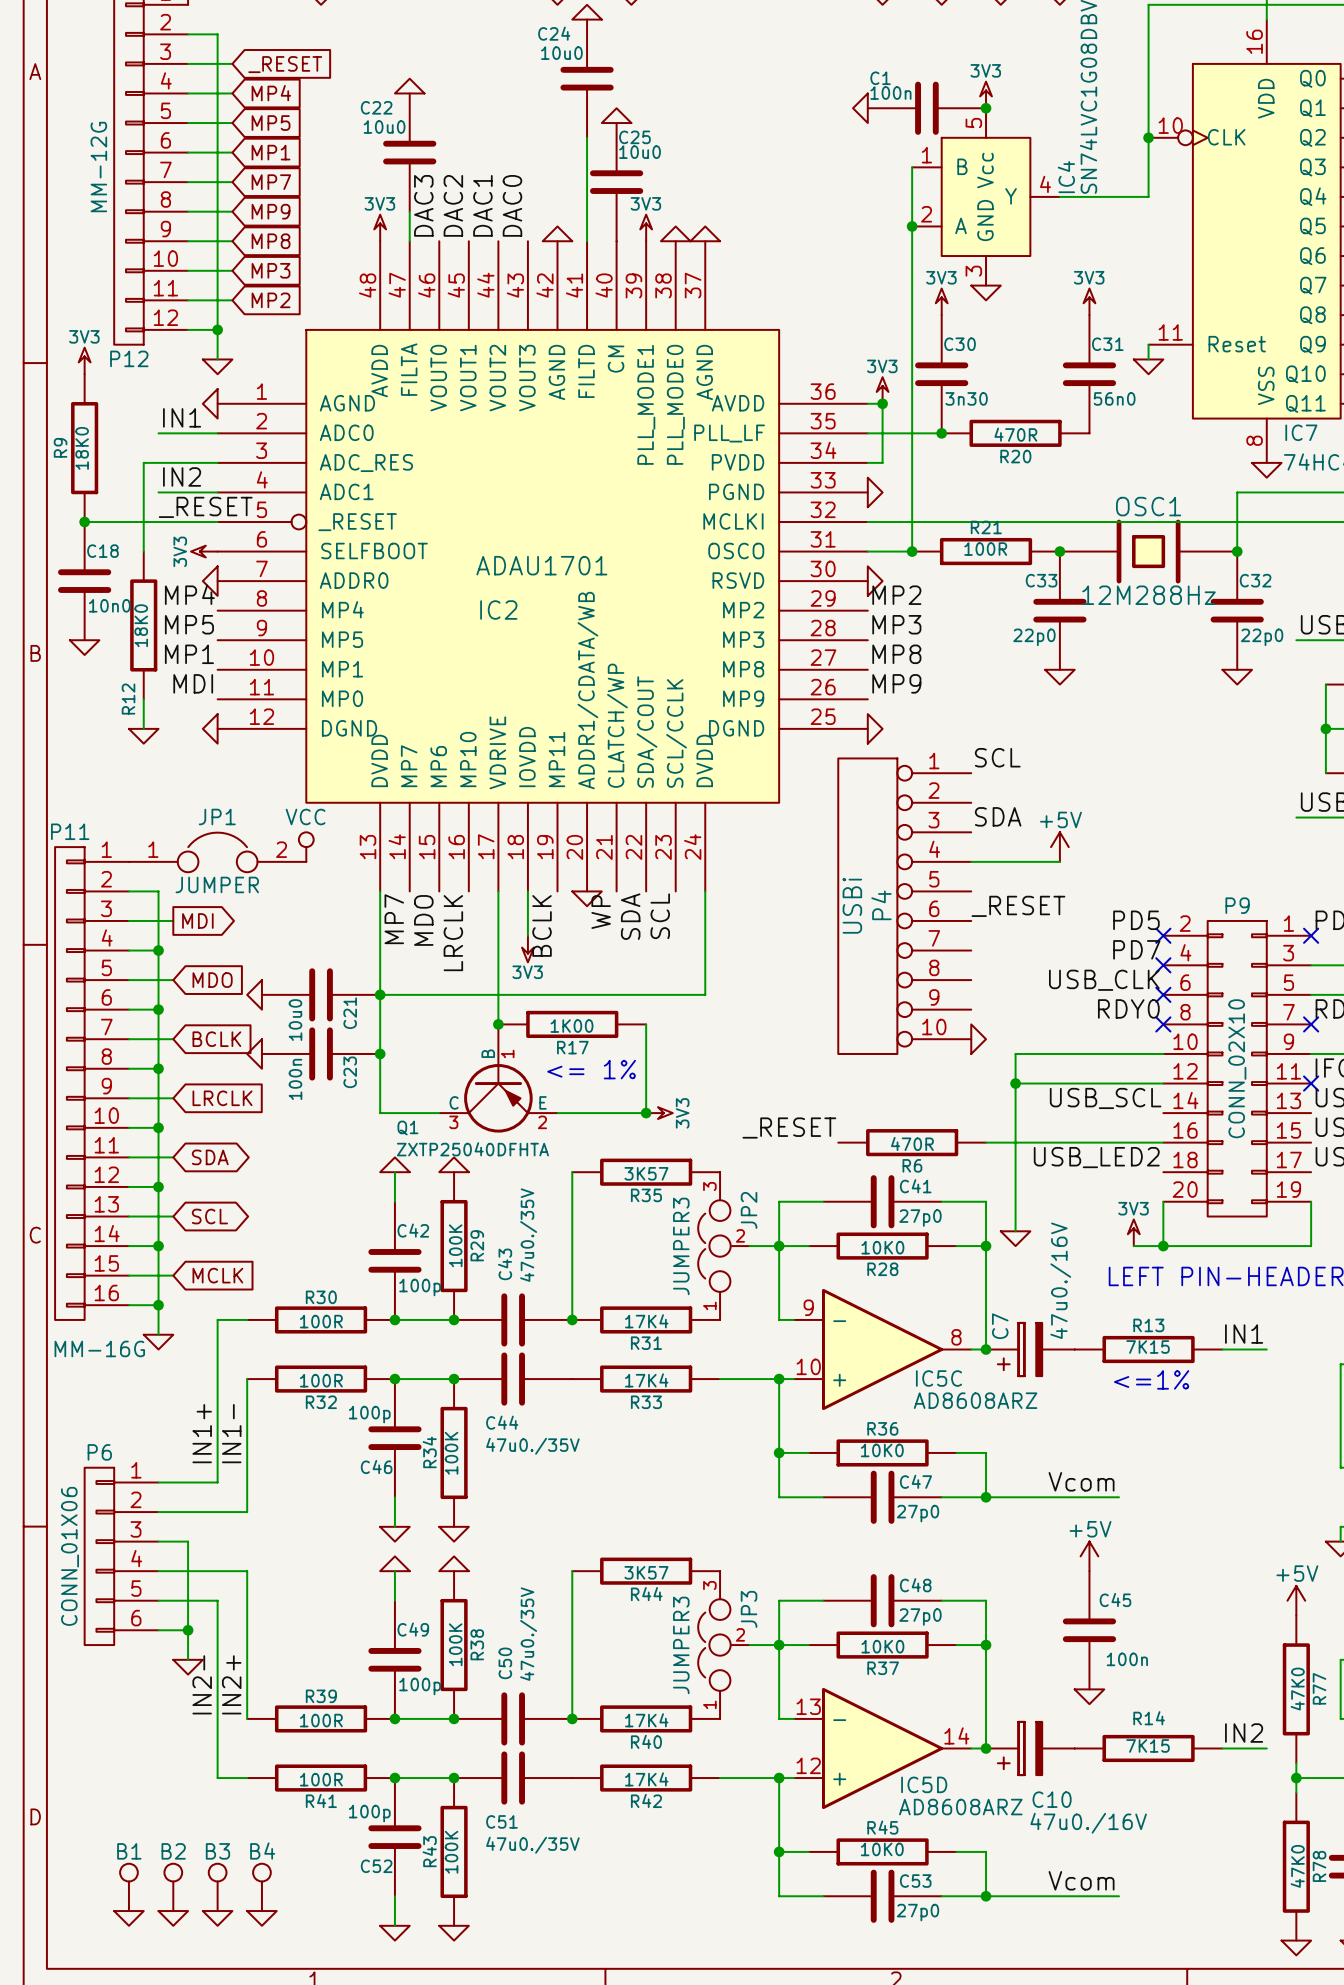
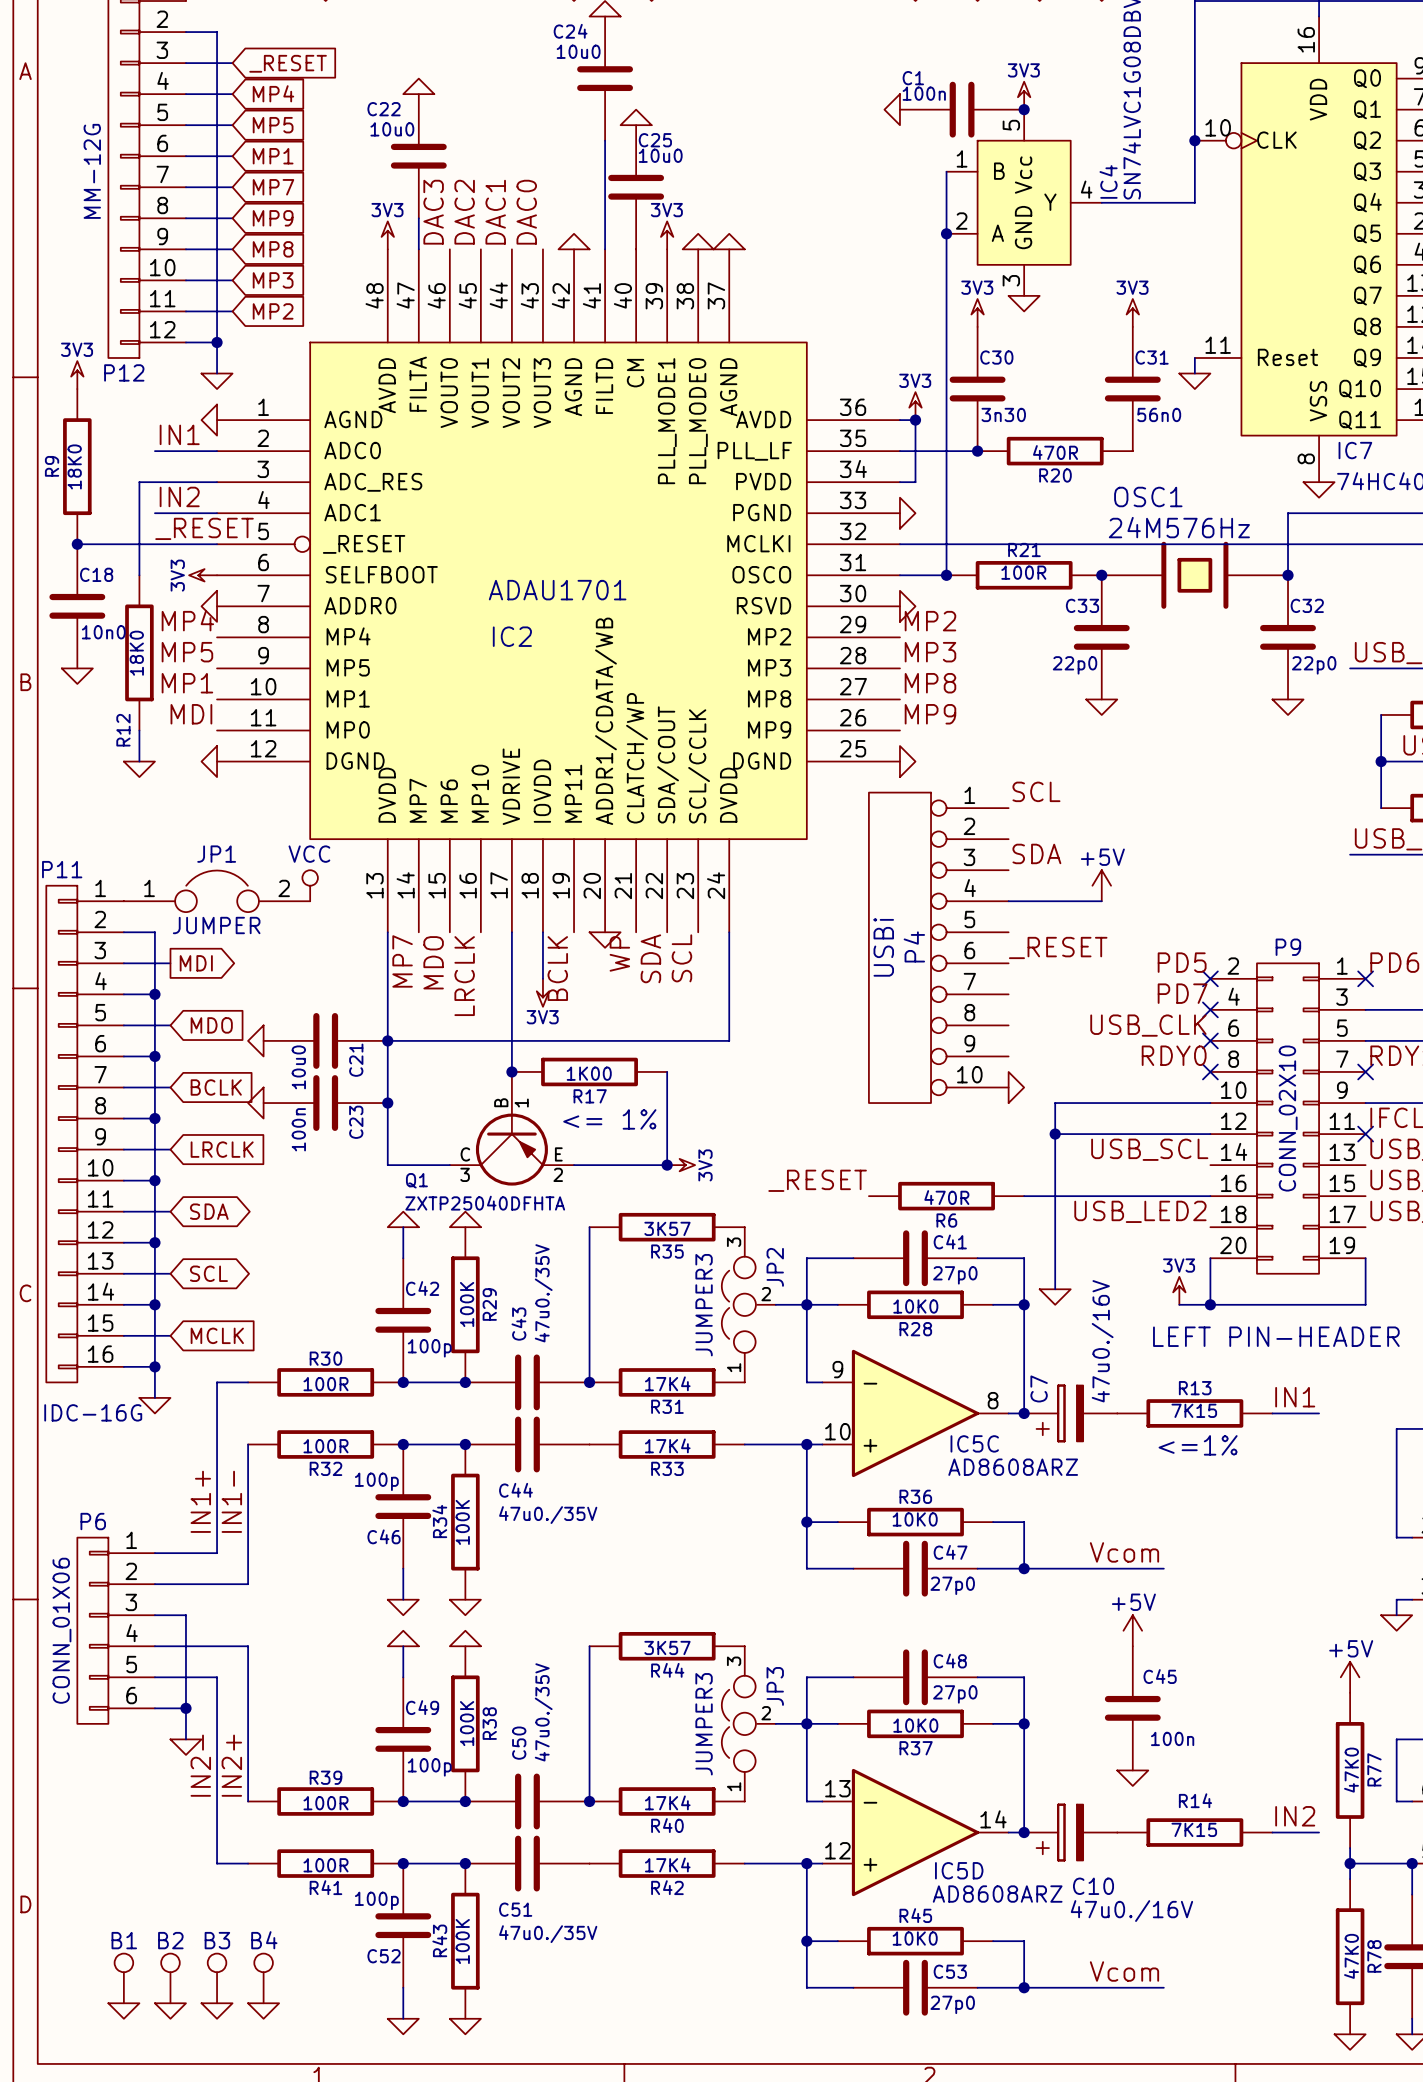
OSC1 name position: OSC1 (1148, 506) -> OSC1 (1148, 496)
OSC1 value: 12M288Hz (1148, 595) -> 24M576Hz (1179, 527)
P11 value: MM-16G (99, 1348) -> IDC-16G (93, 1412)

